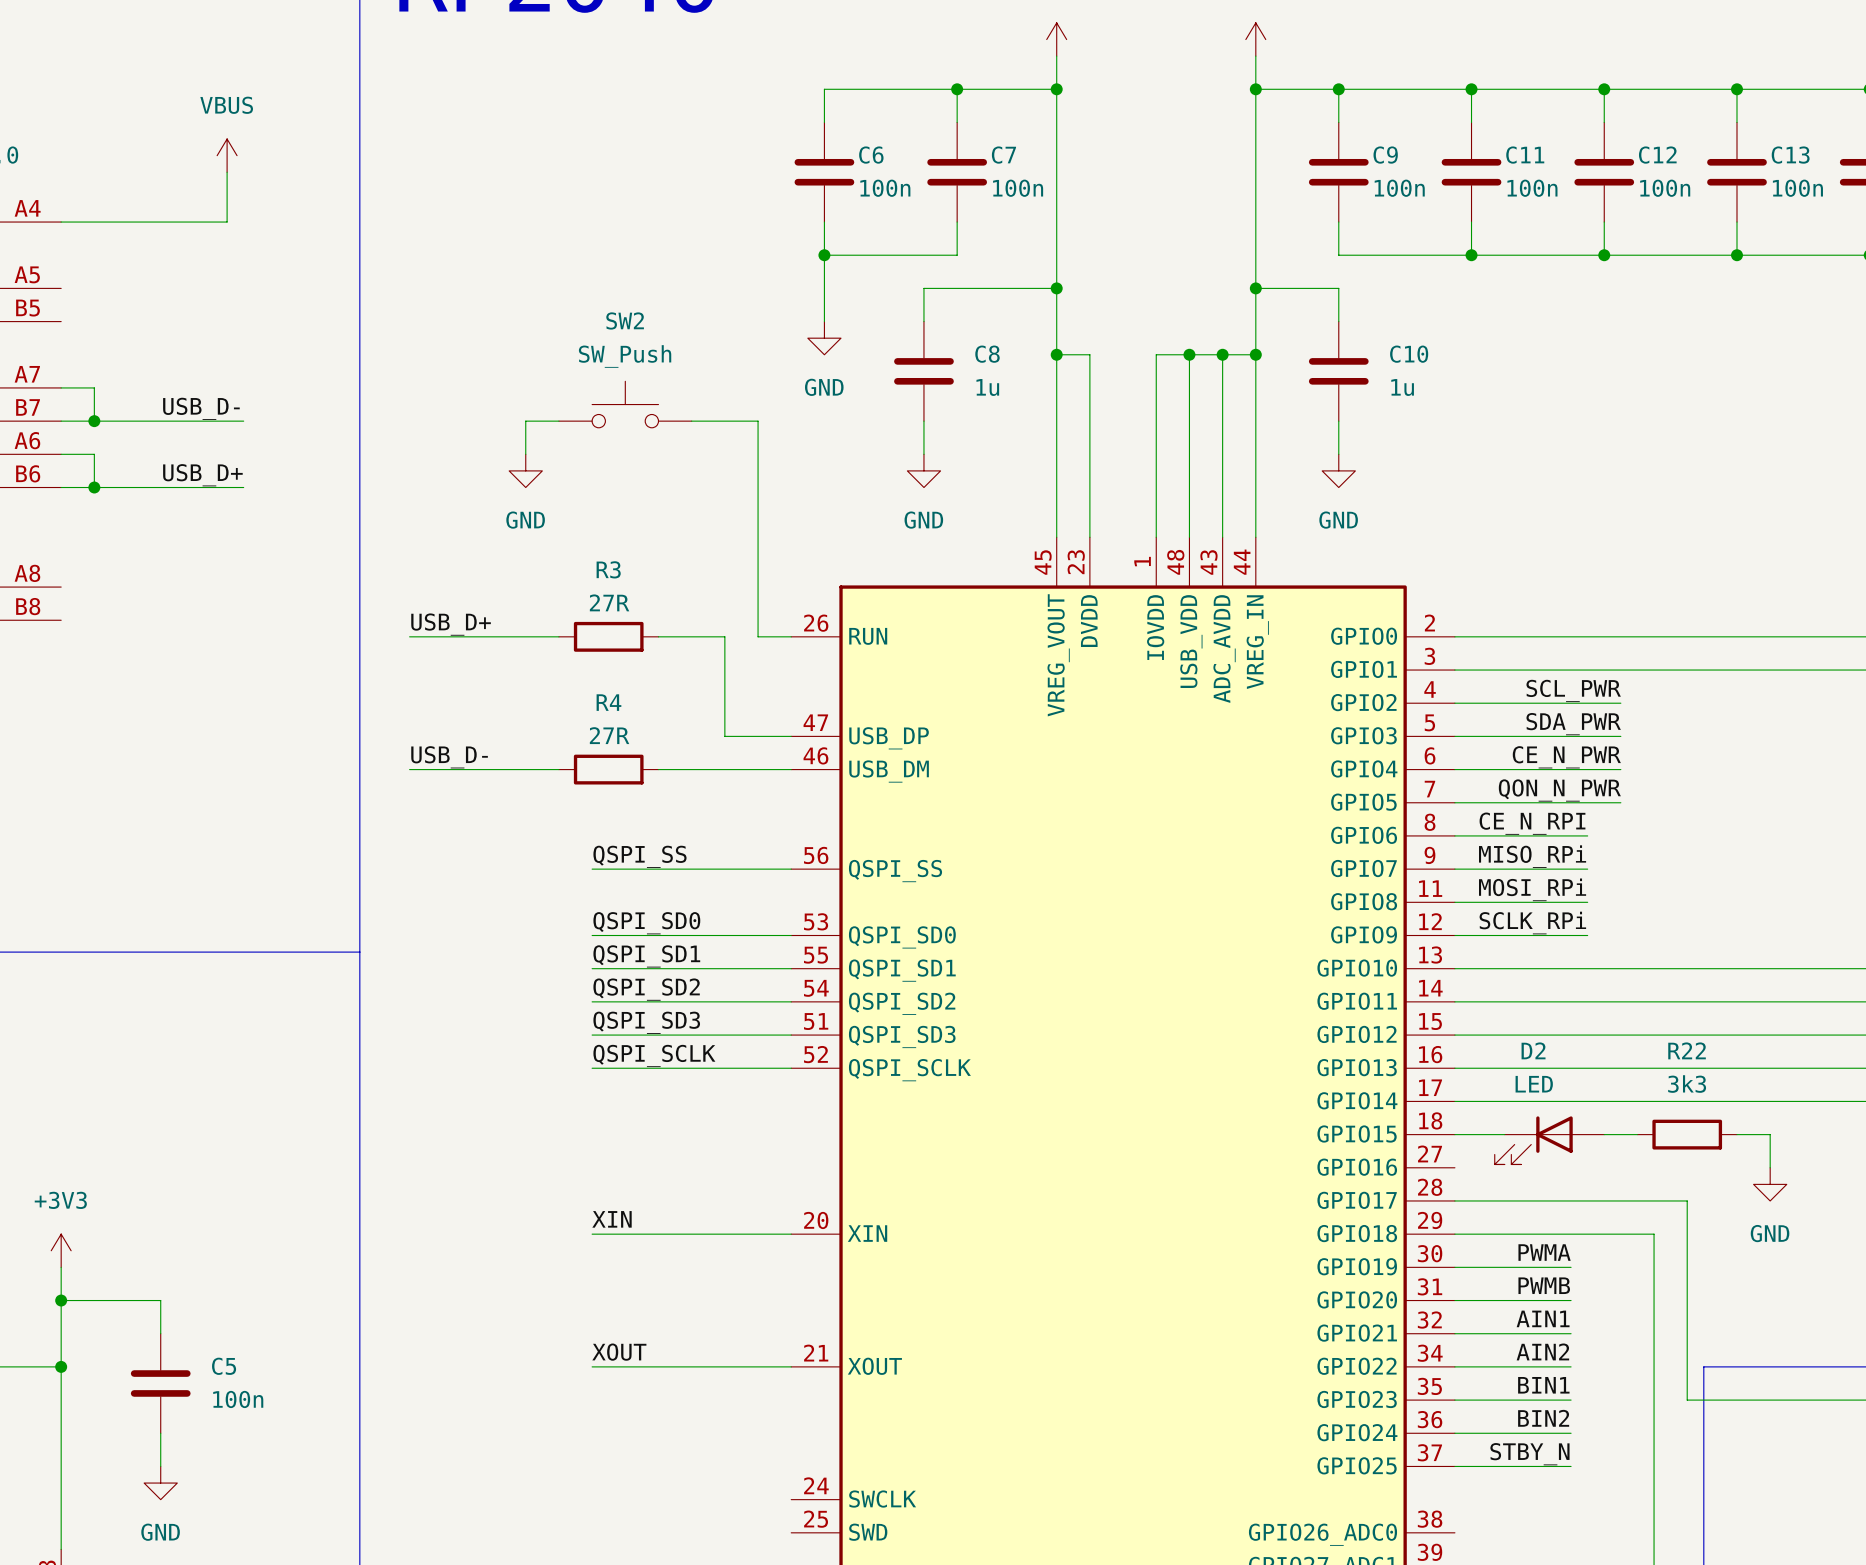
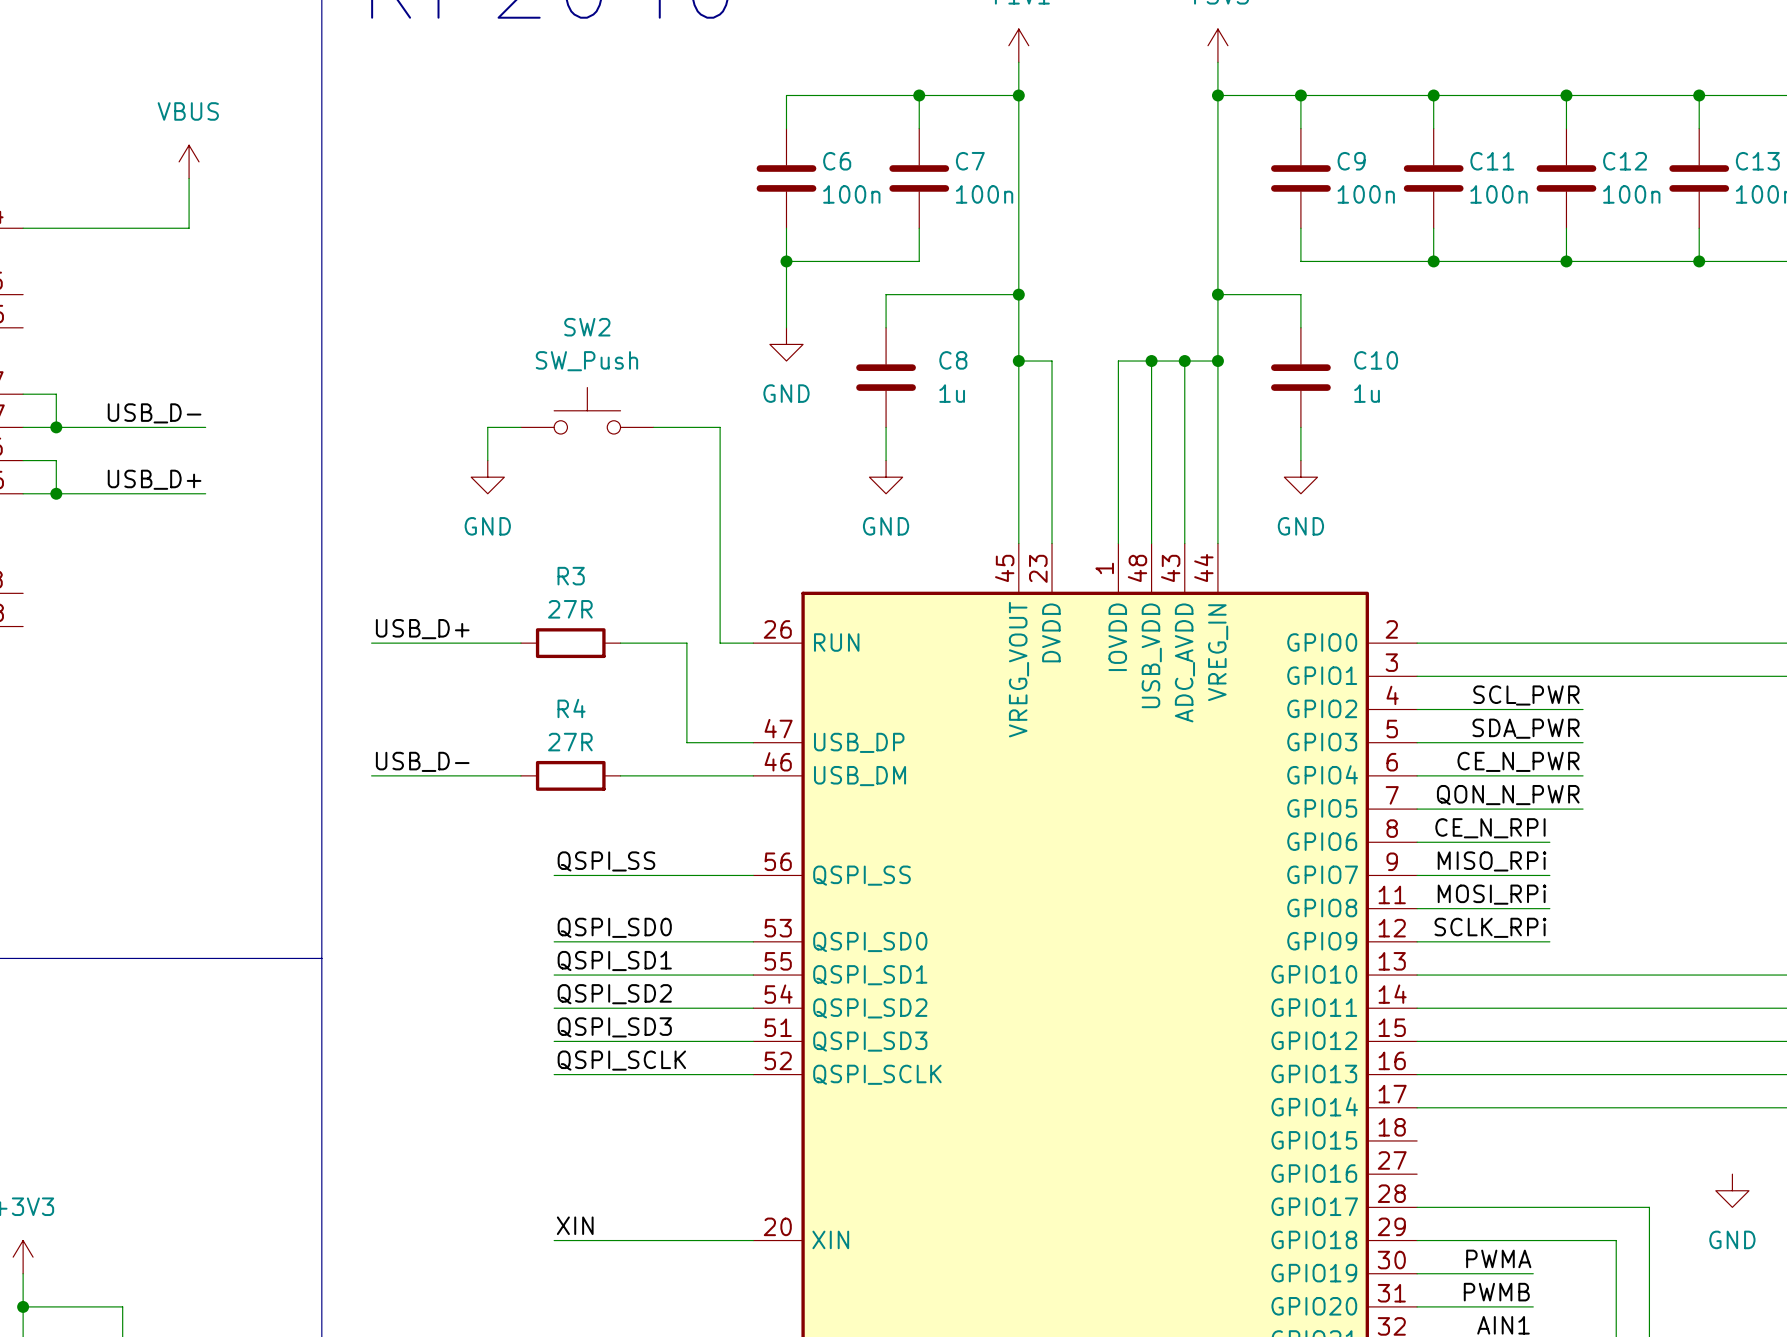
wire: (1454, 1134) (1504, 1134) -> none
wire: (1604, 1134) (1637, 1134) -> none
R22: 3k3 (1687, 1134) -> none
wire: (1736, 1134) (1770, 1134) (1770, 1167) -> none
D2: LED (1549, 1140) -> none

